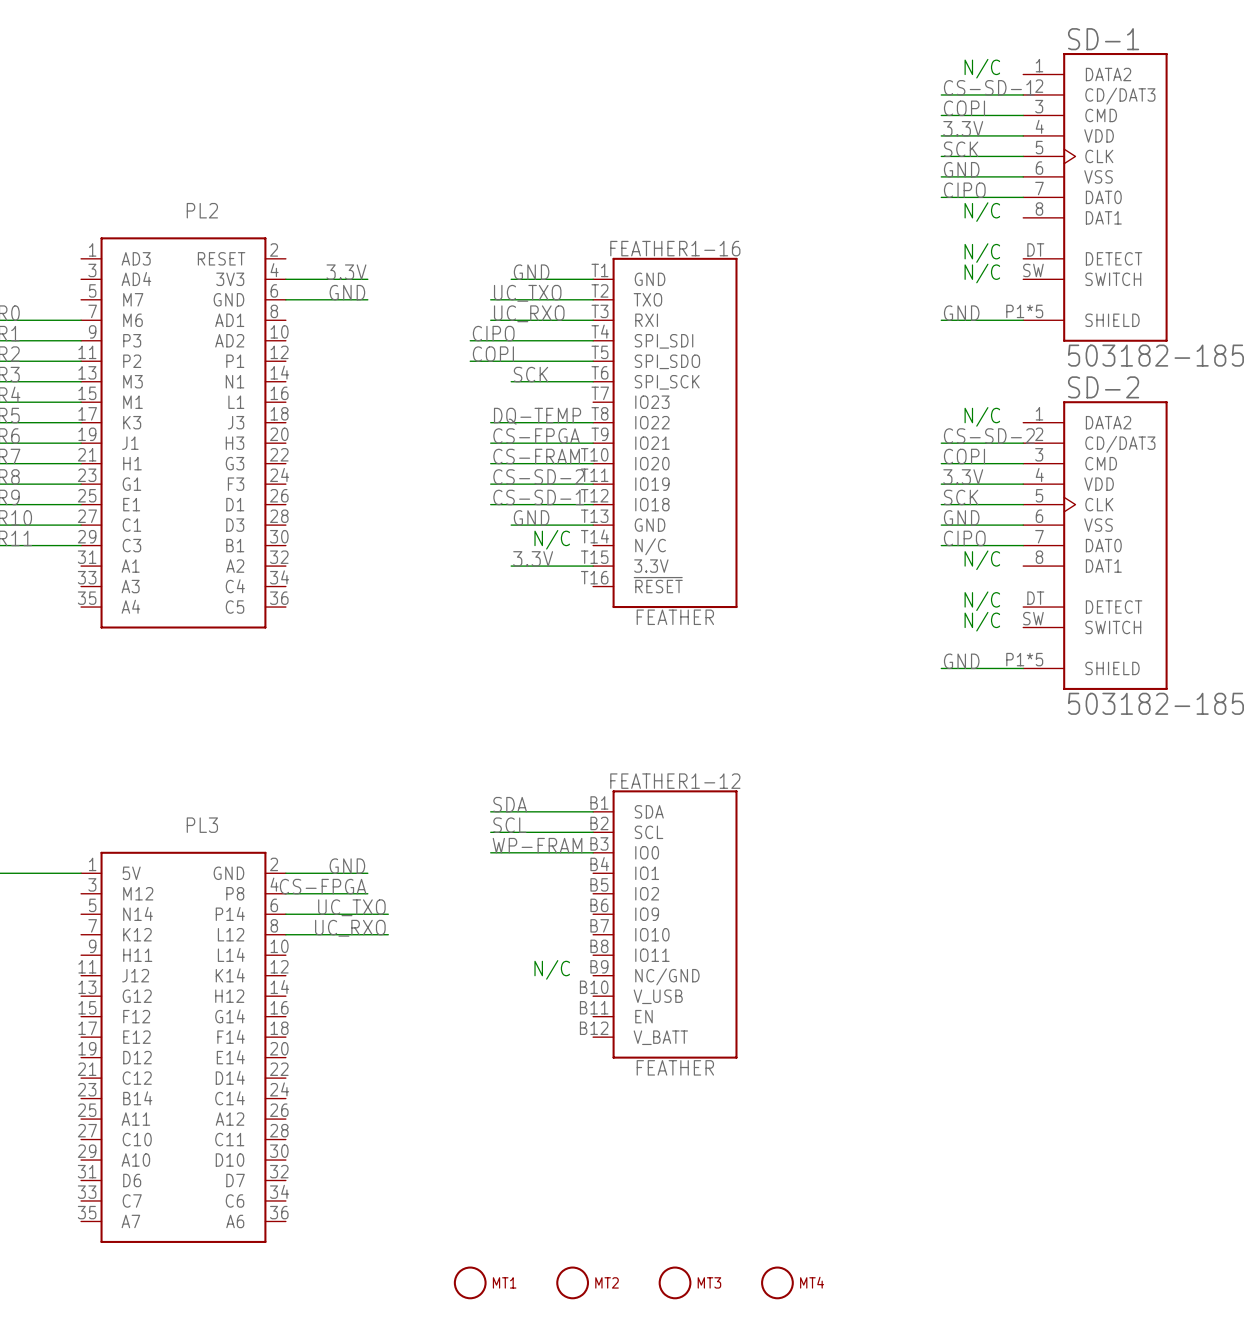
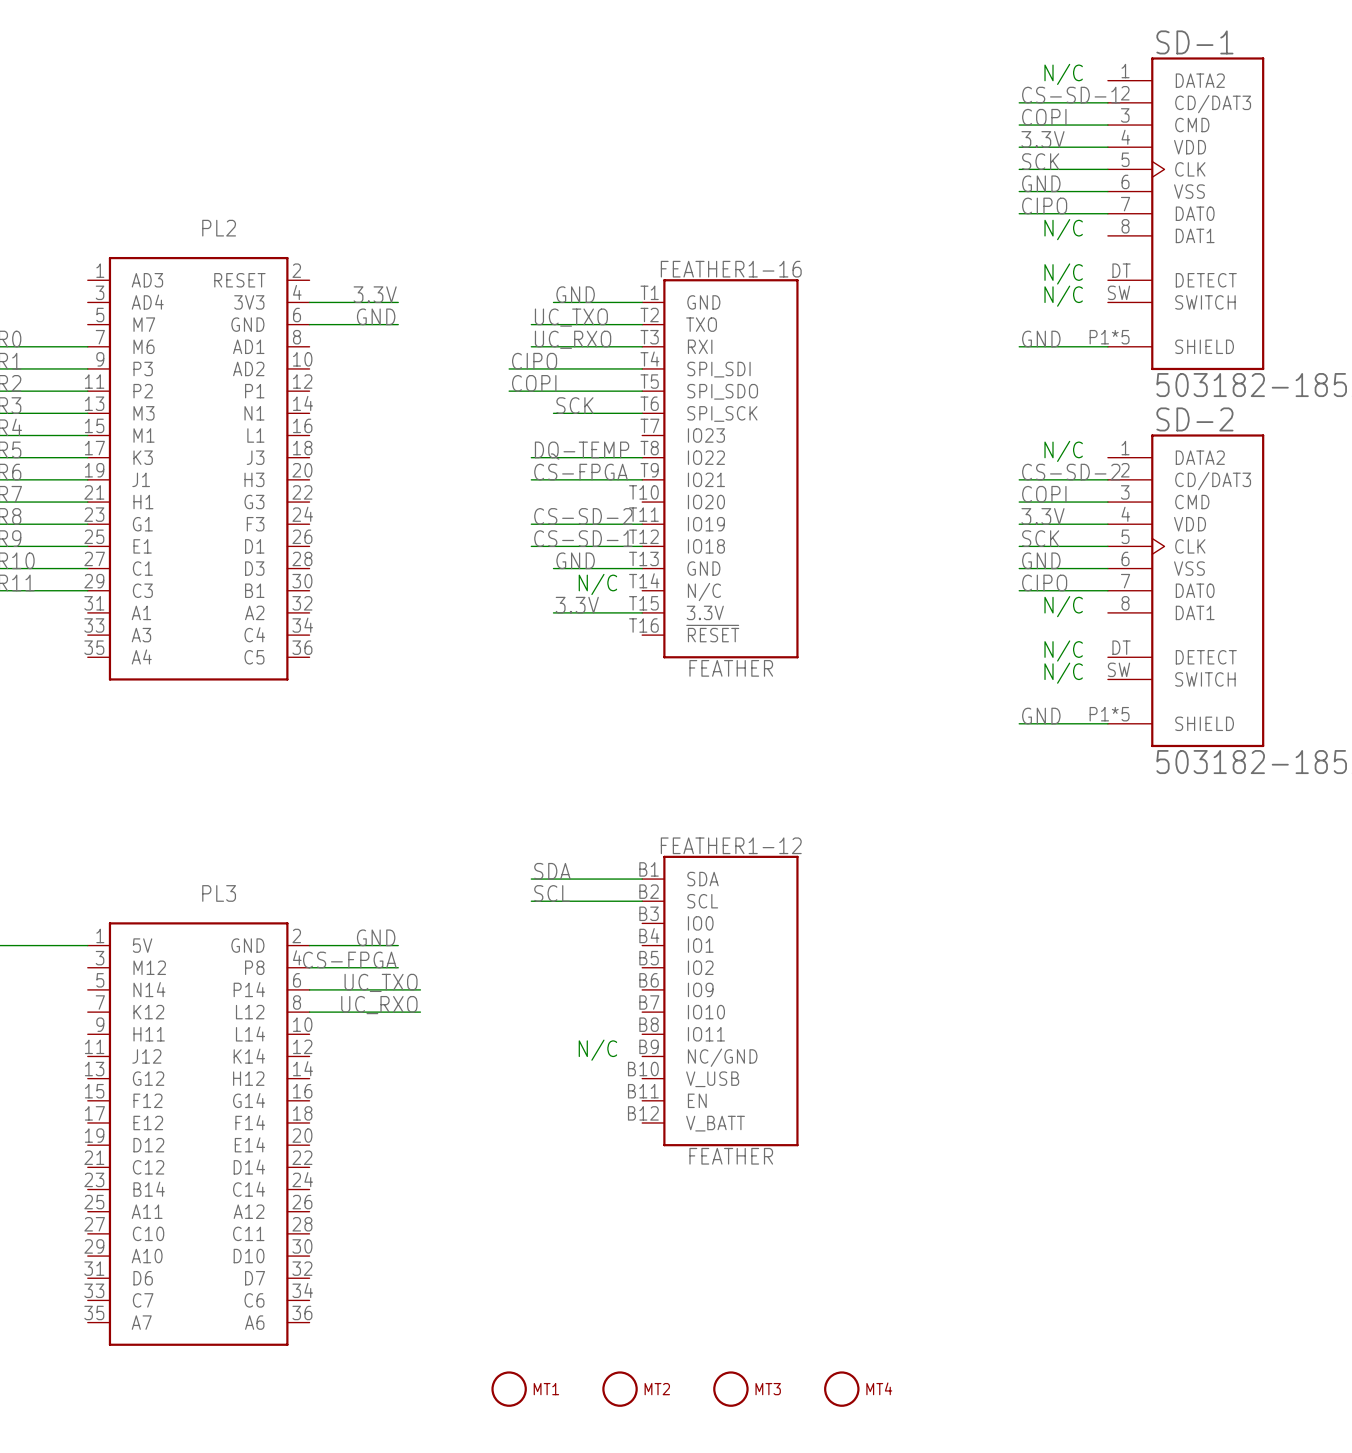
label: CS-FRAM (536, 456) -> none
wire: (490, 463) (593, 463) -> none
label: WP-FRAM (537, 845) -> none
wire: (490, 852) (593, 852) -> none

